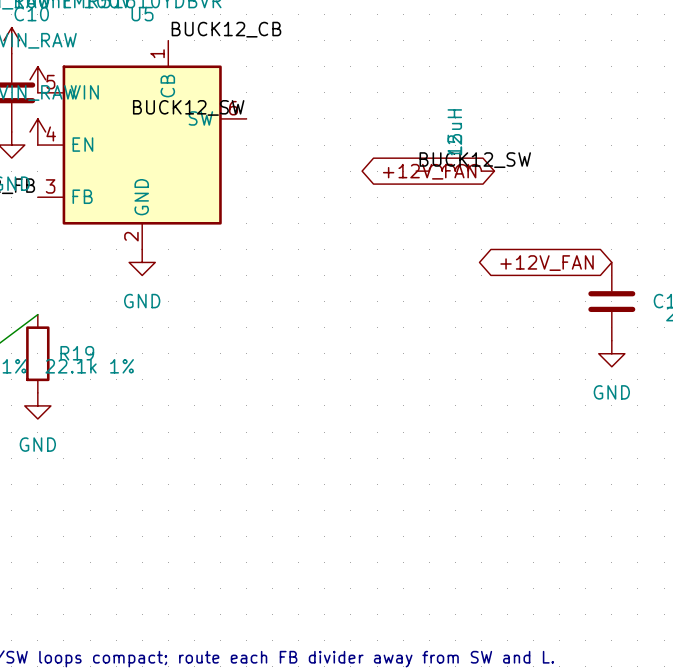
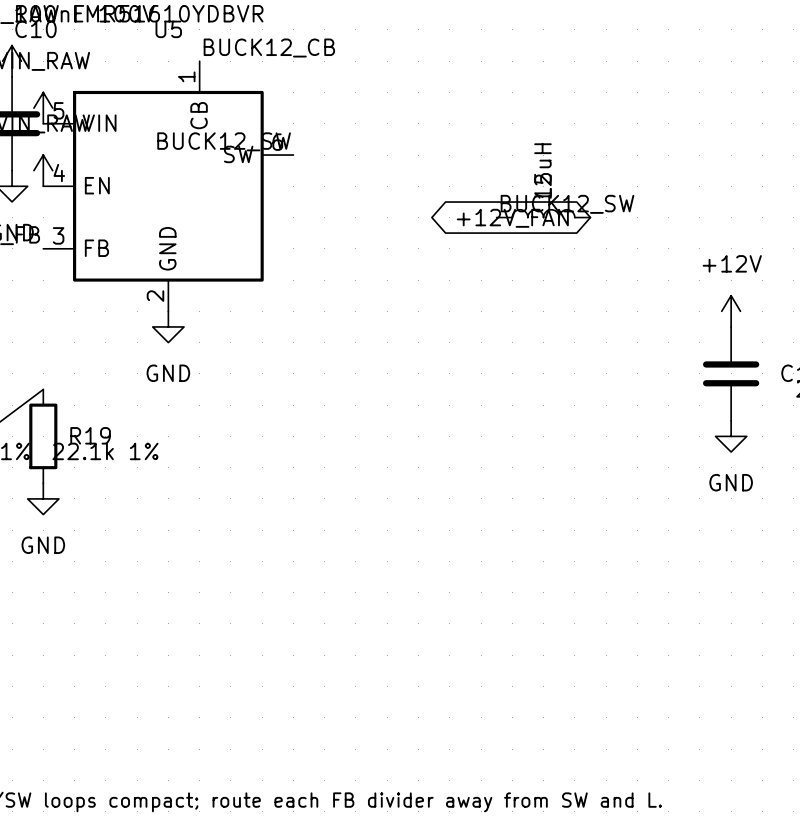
power symbol: none -> +12V (731, 311)
global label: +12V_FAN (547, 263) -> none

